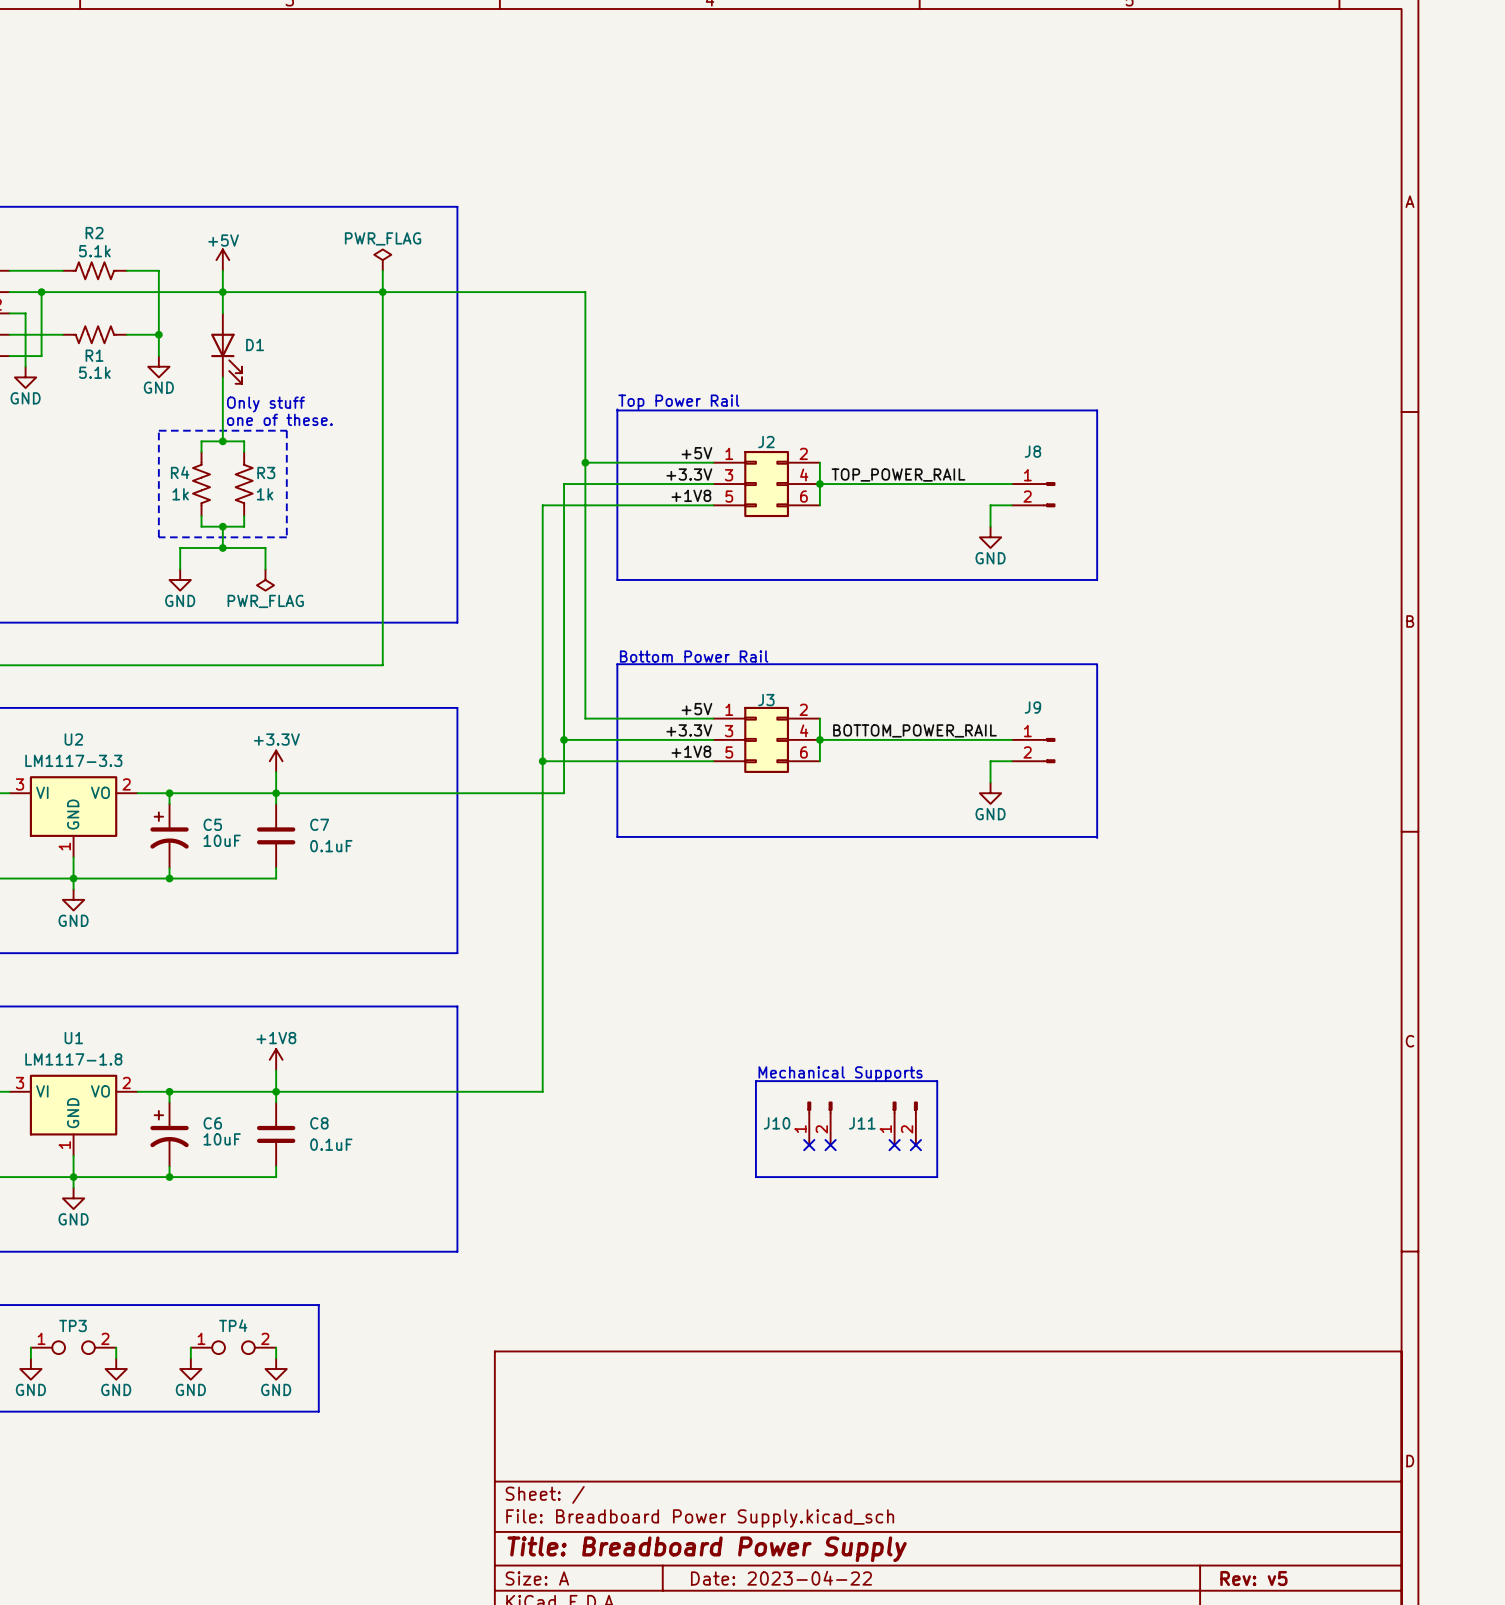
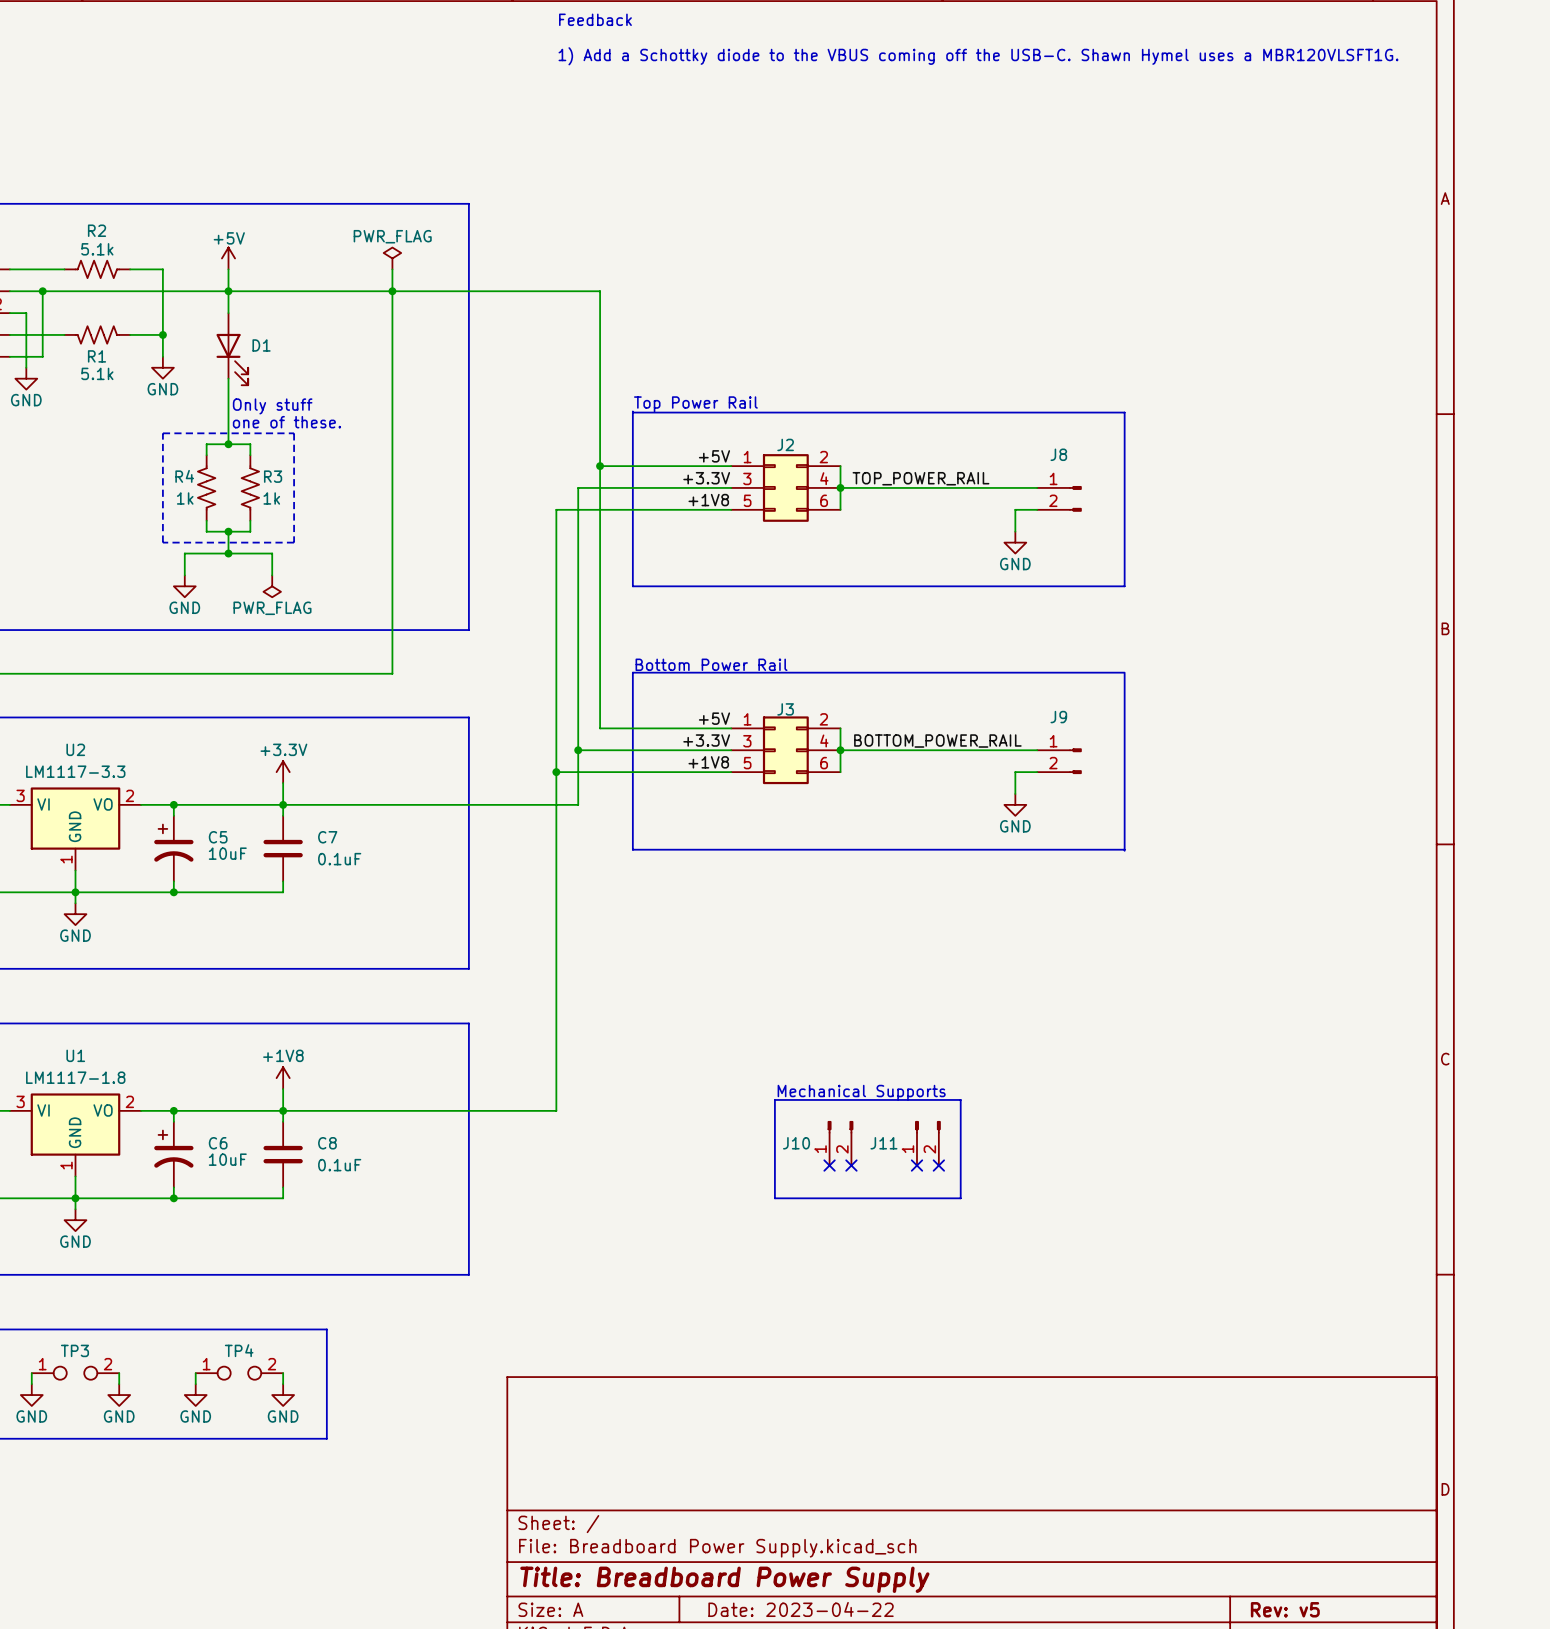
text: none -> Feedback (595, 19)
text: none -> 1) Add a Schottky diode to the VBUS coming off the USB-C. Shawn Hymel uses a MBR120VLSFT1G. (978, 56)

